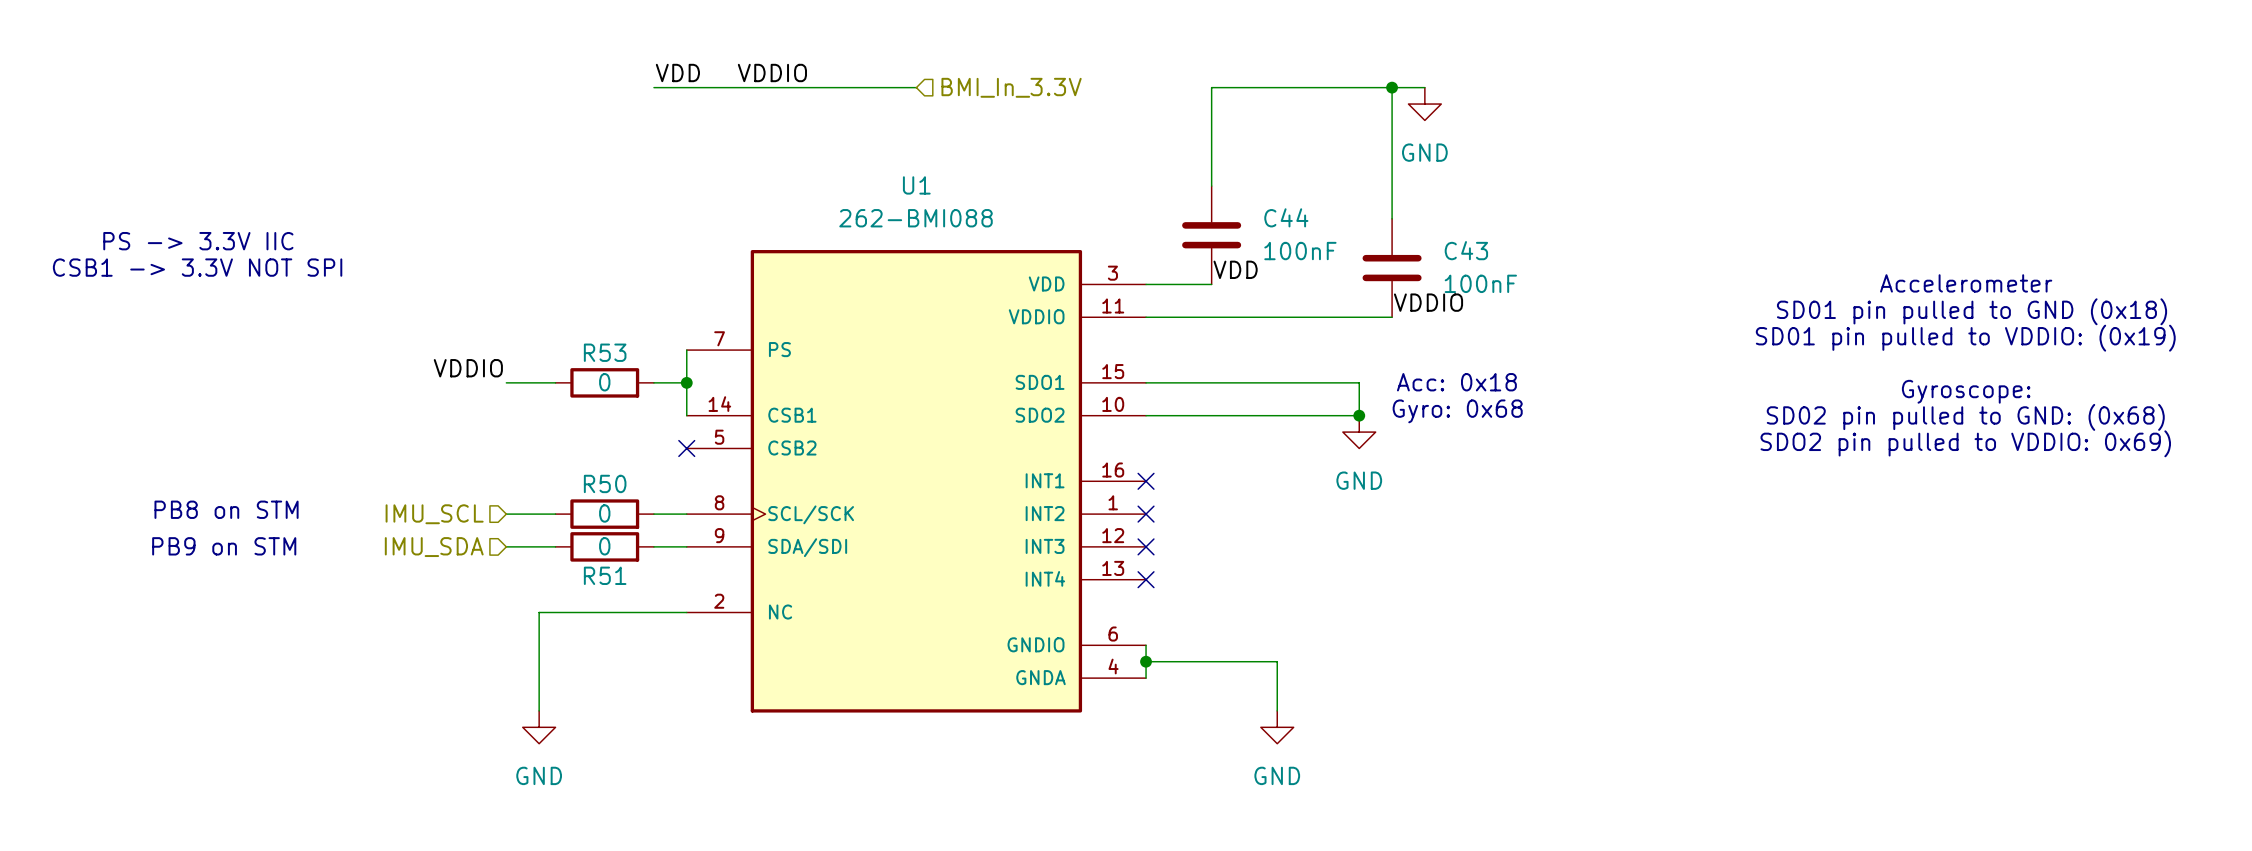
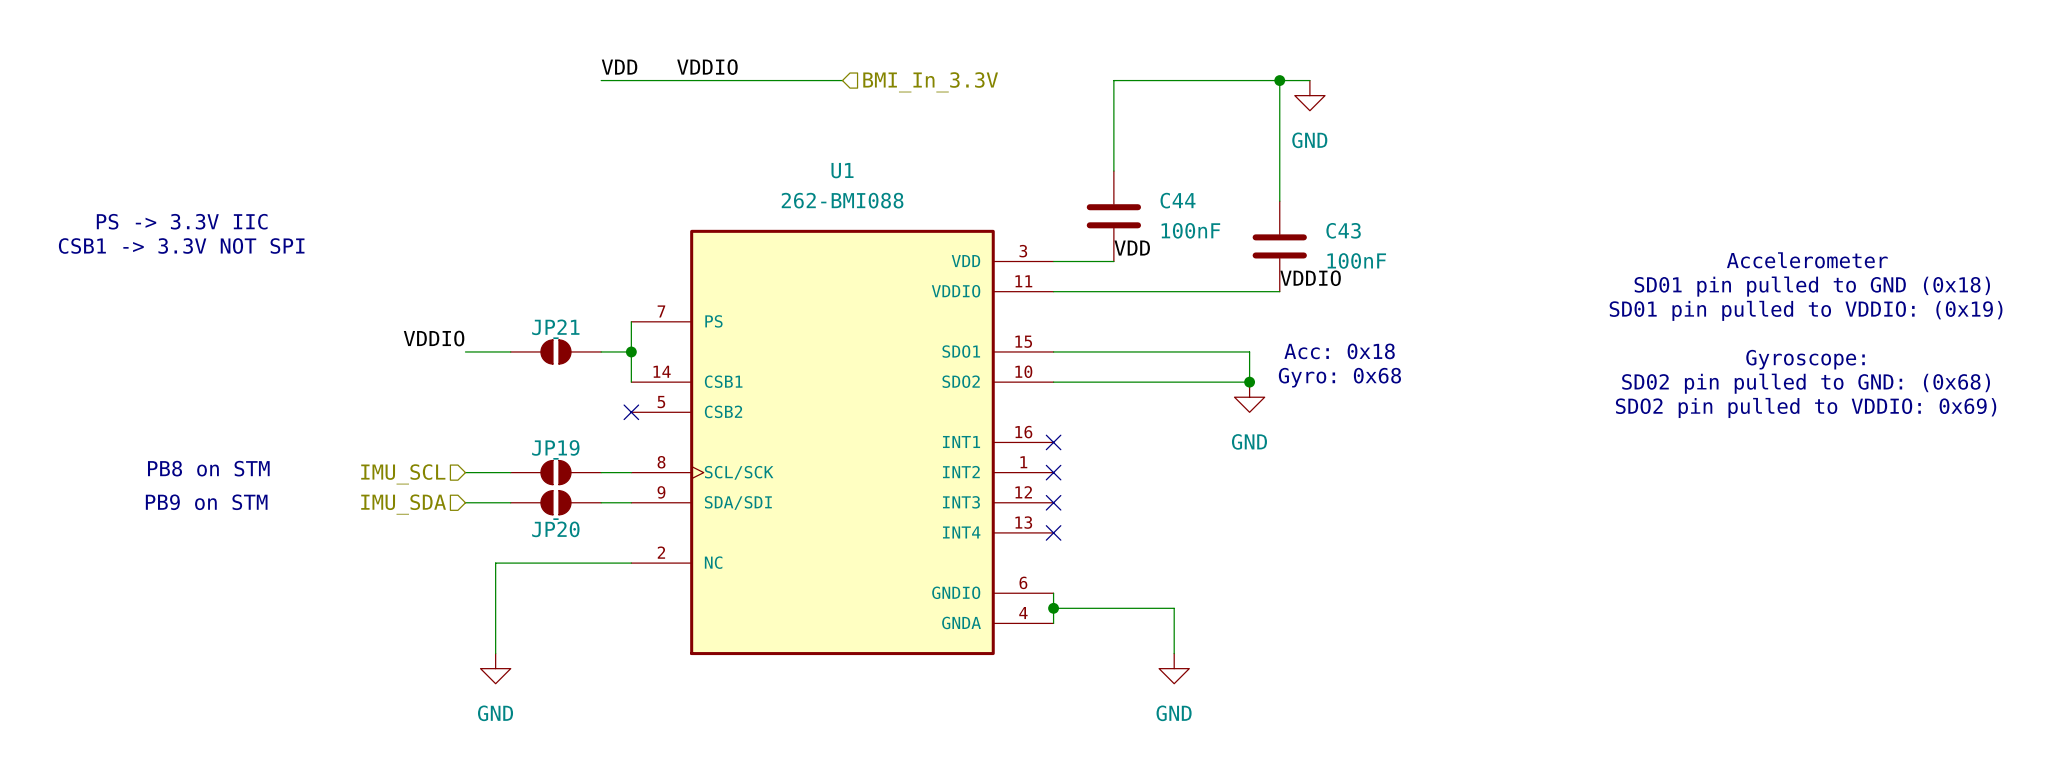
R53: 0 (604, 382) -> none
JP21: none -> - (555, 351)
R50: 0 (604, 514) -> none
JP19: none -> - (555, 472)
R51: 0 (604, 546) -> none
JP20: none -> - (555, 502)

